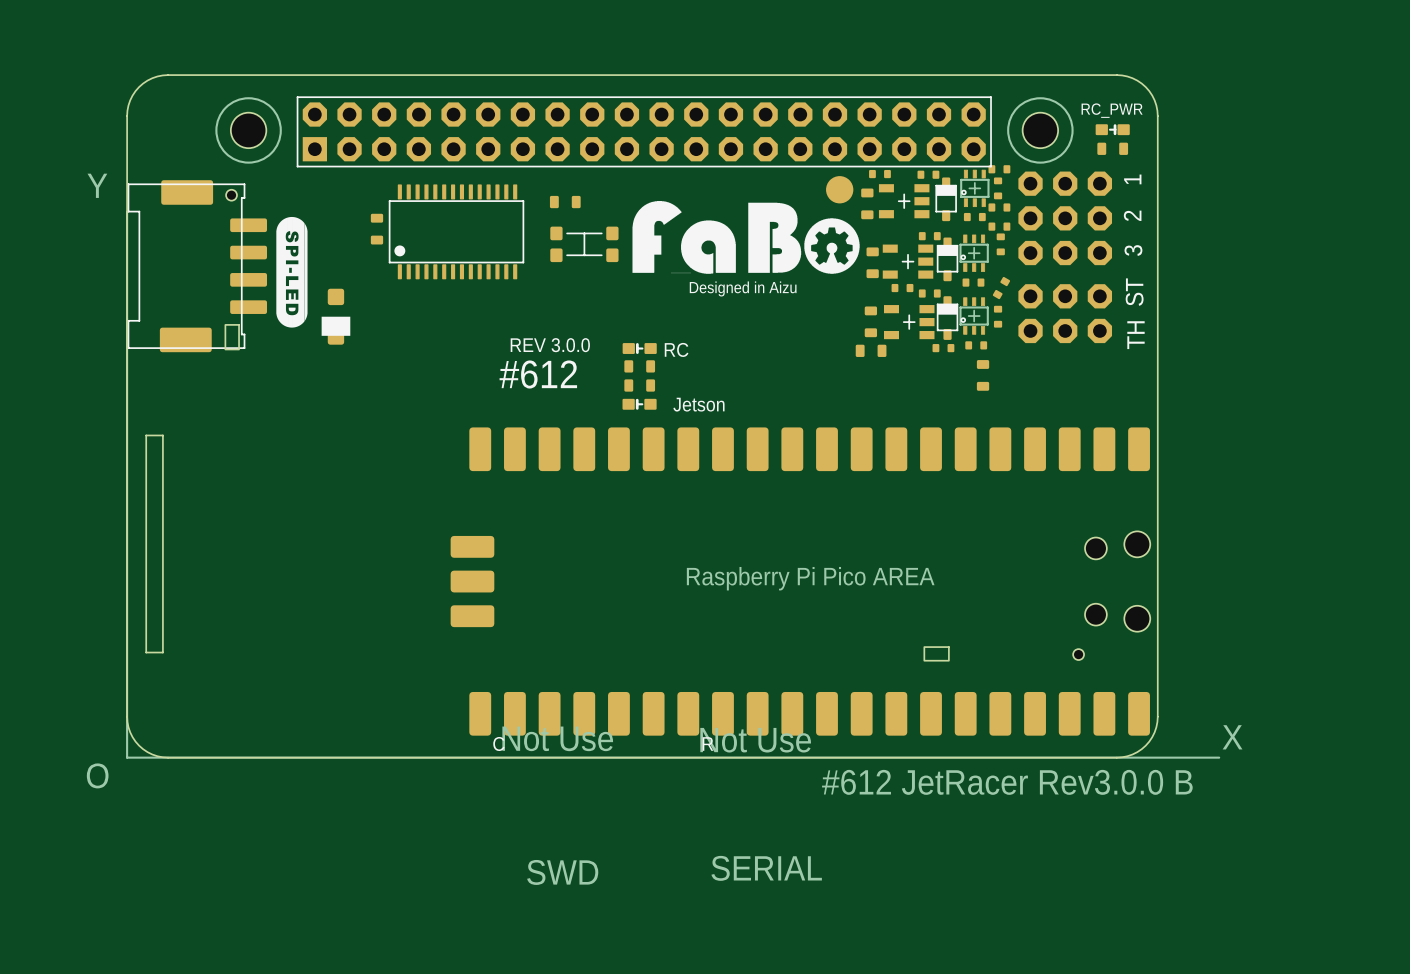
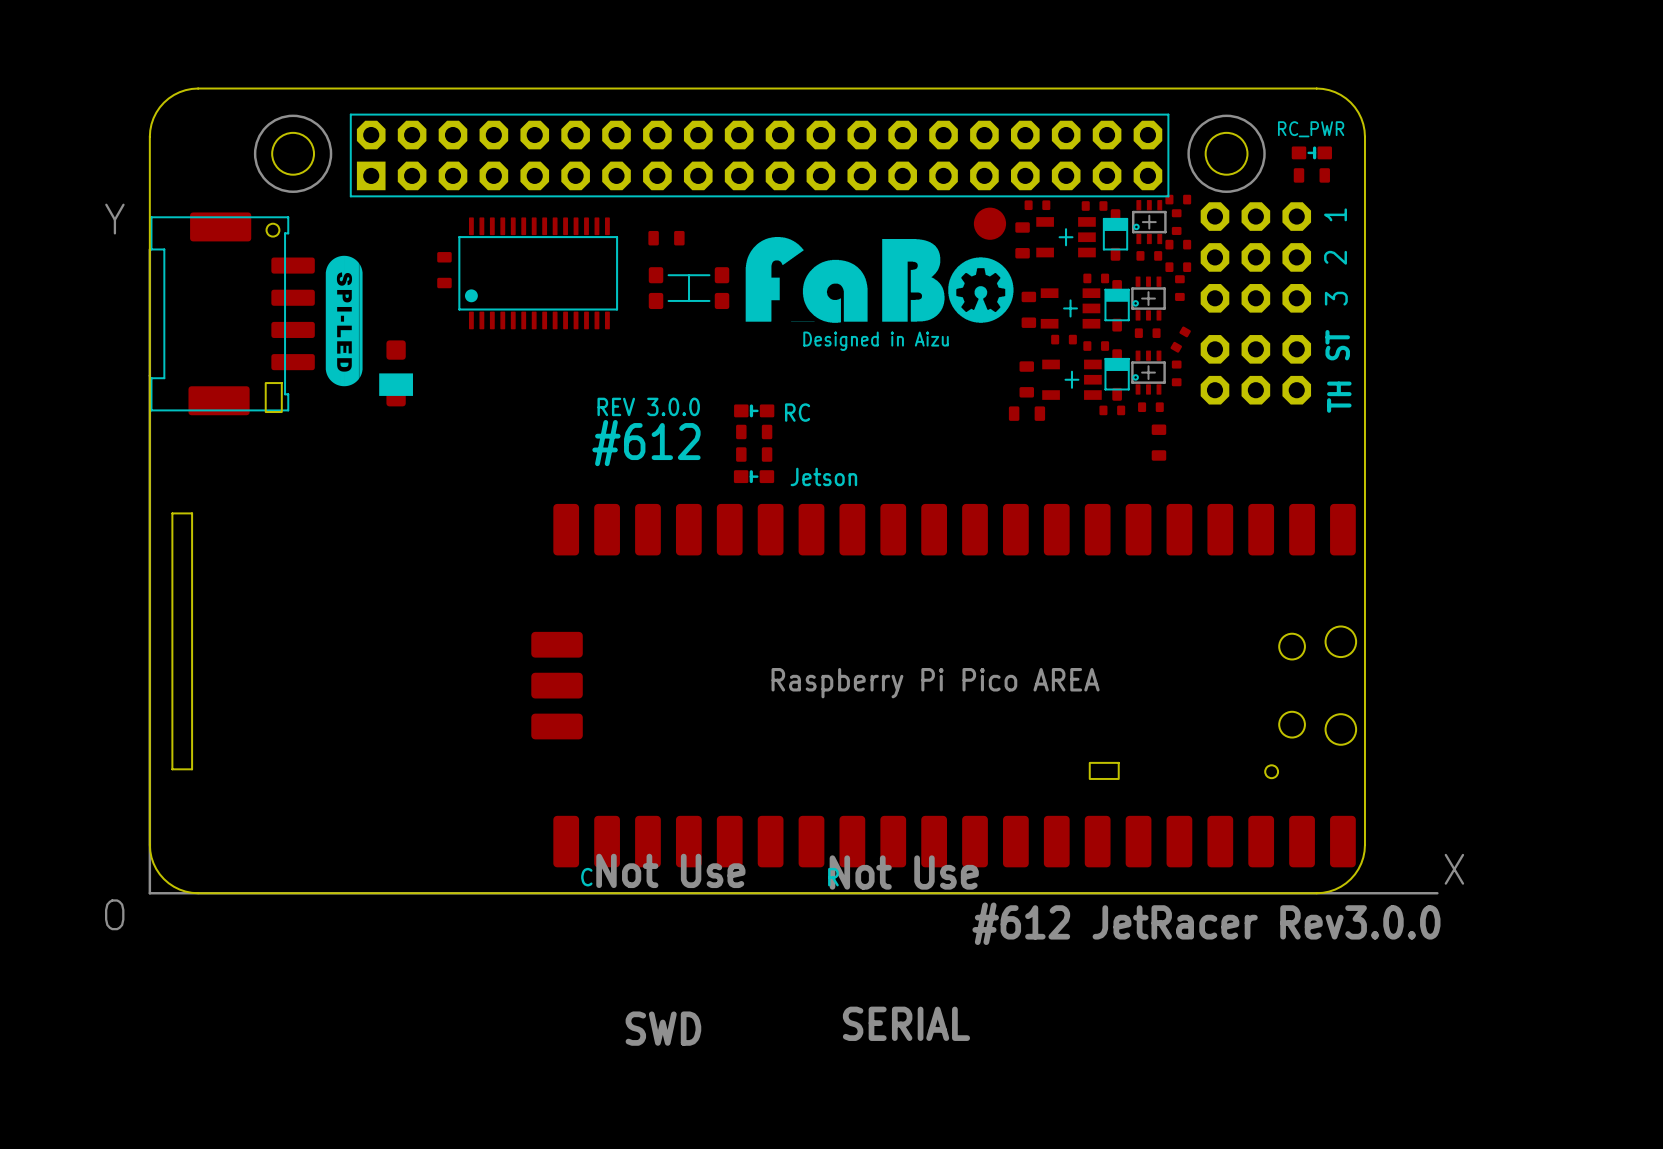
text: #612 JetRacer Rev3.0.0 B (1007, 782) -> #612 JetRacer Rev3.0.0 (1206, 923)

